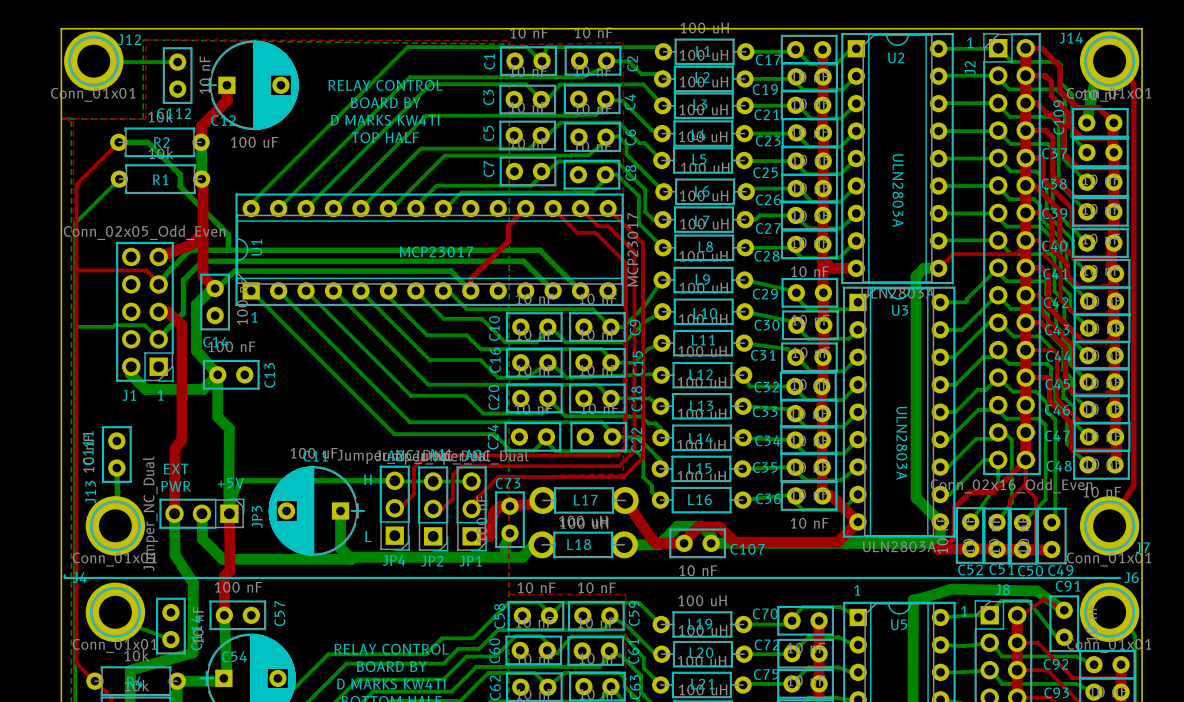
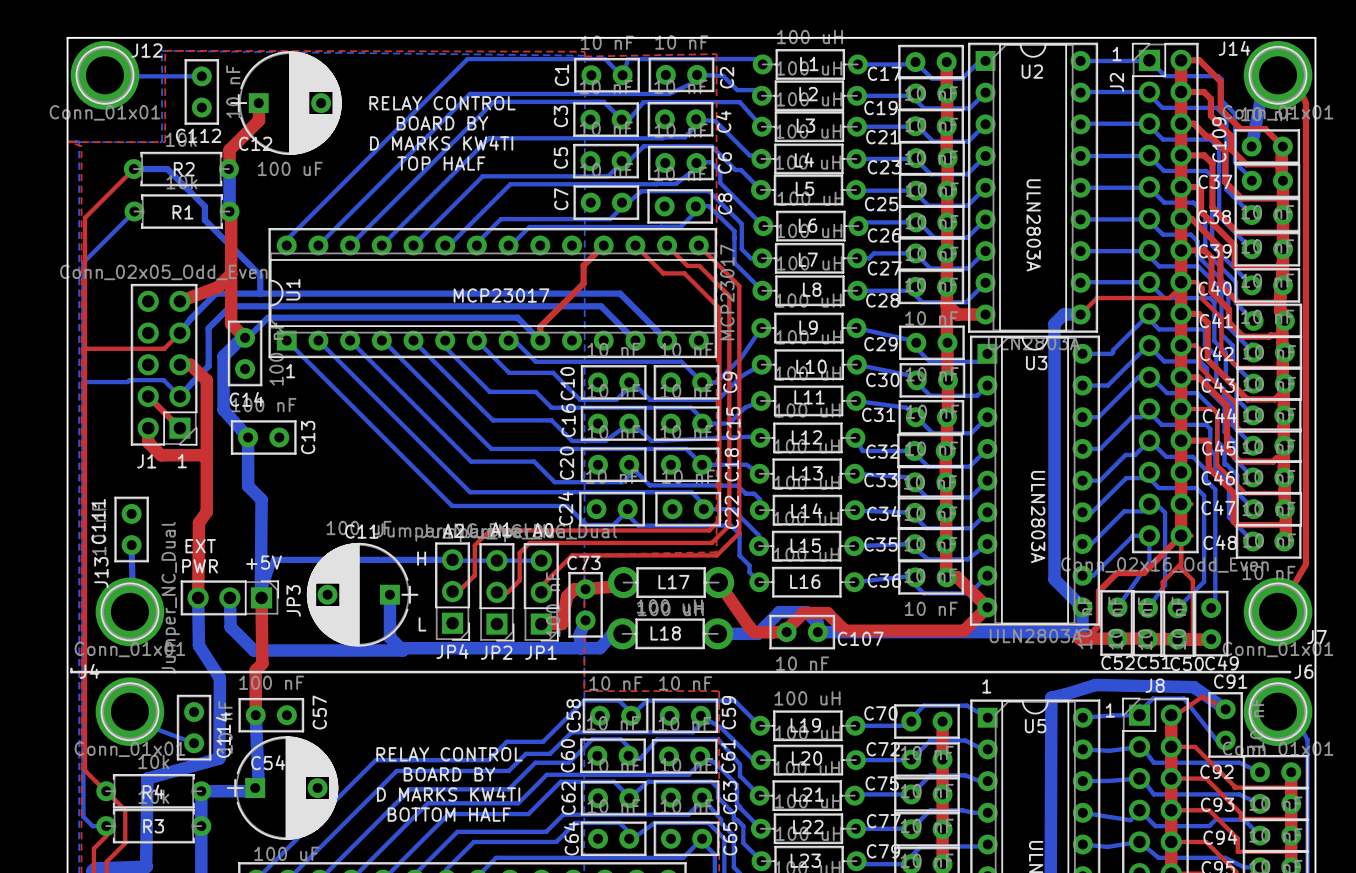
top track: (76, 270) (146, 270) (158, 282) -> none
top track: none -> (179, 333) (164, 348) (85, 348)
top track: none -> (148, 396) (179, 428)
top track: none -> (148, 428) (148, 442) (161, 455) (206, 455)
bottom track: (131, 366) (130, 374) (145, 389) (203, 389) (217, 374) -> none

